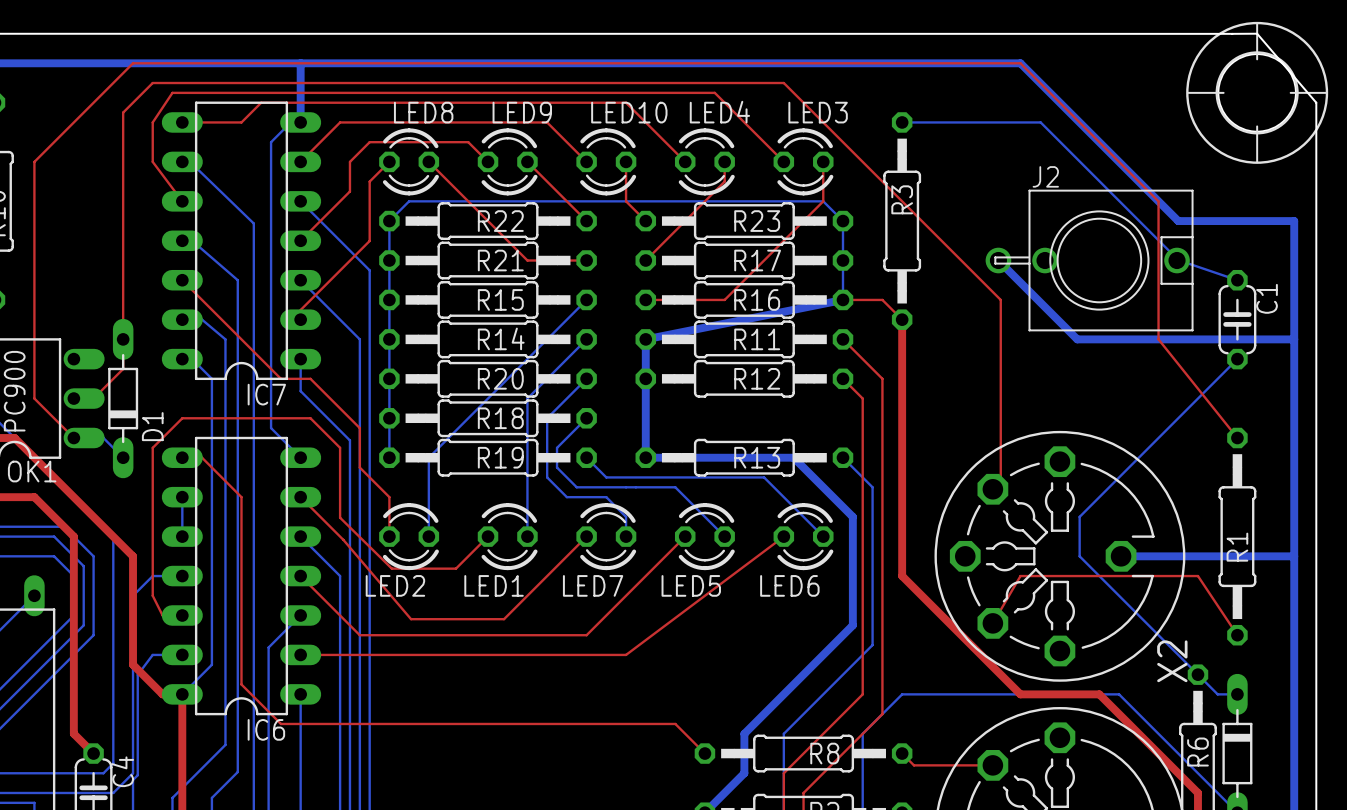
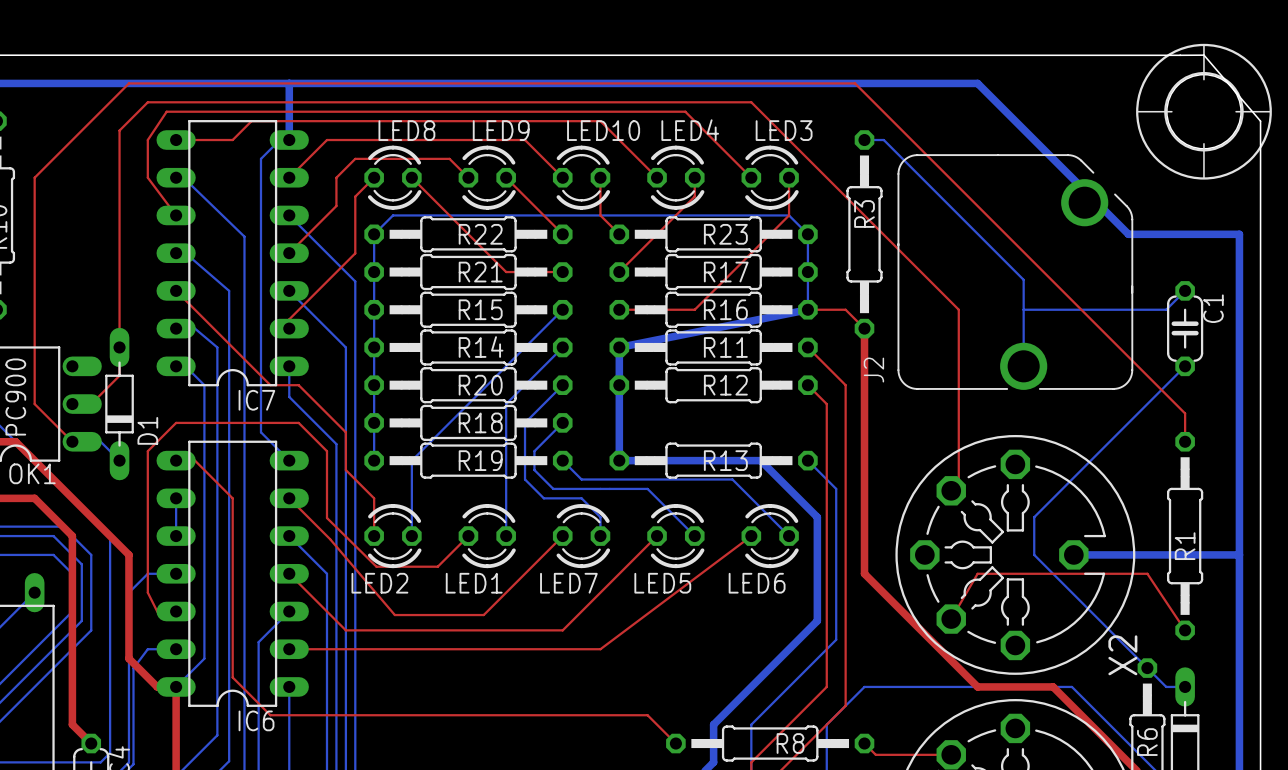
top track: (892, 63) (1020, 63) (1158, 201) (1158, 339) (1237, 438) -> (855, 83) (1185, 413) (1185, 441)
bottom track: (922, 122) (1040, 122) (1178, 260) -> (883, 140) (1023, 279) (1023, 366)
J2 name position: J2 (1045, 176) -> J2 (873, 370)
J2 footprint: [985, 189, 1194, 332] -> [897, 154, 1134, 390]
bottom track: (998, 260) (1077, 339) (1294, 339) -> none
bottom track: (1177, 260) (1237, 280) -> (1023, 309) (1166, 309) (1185, 290)

